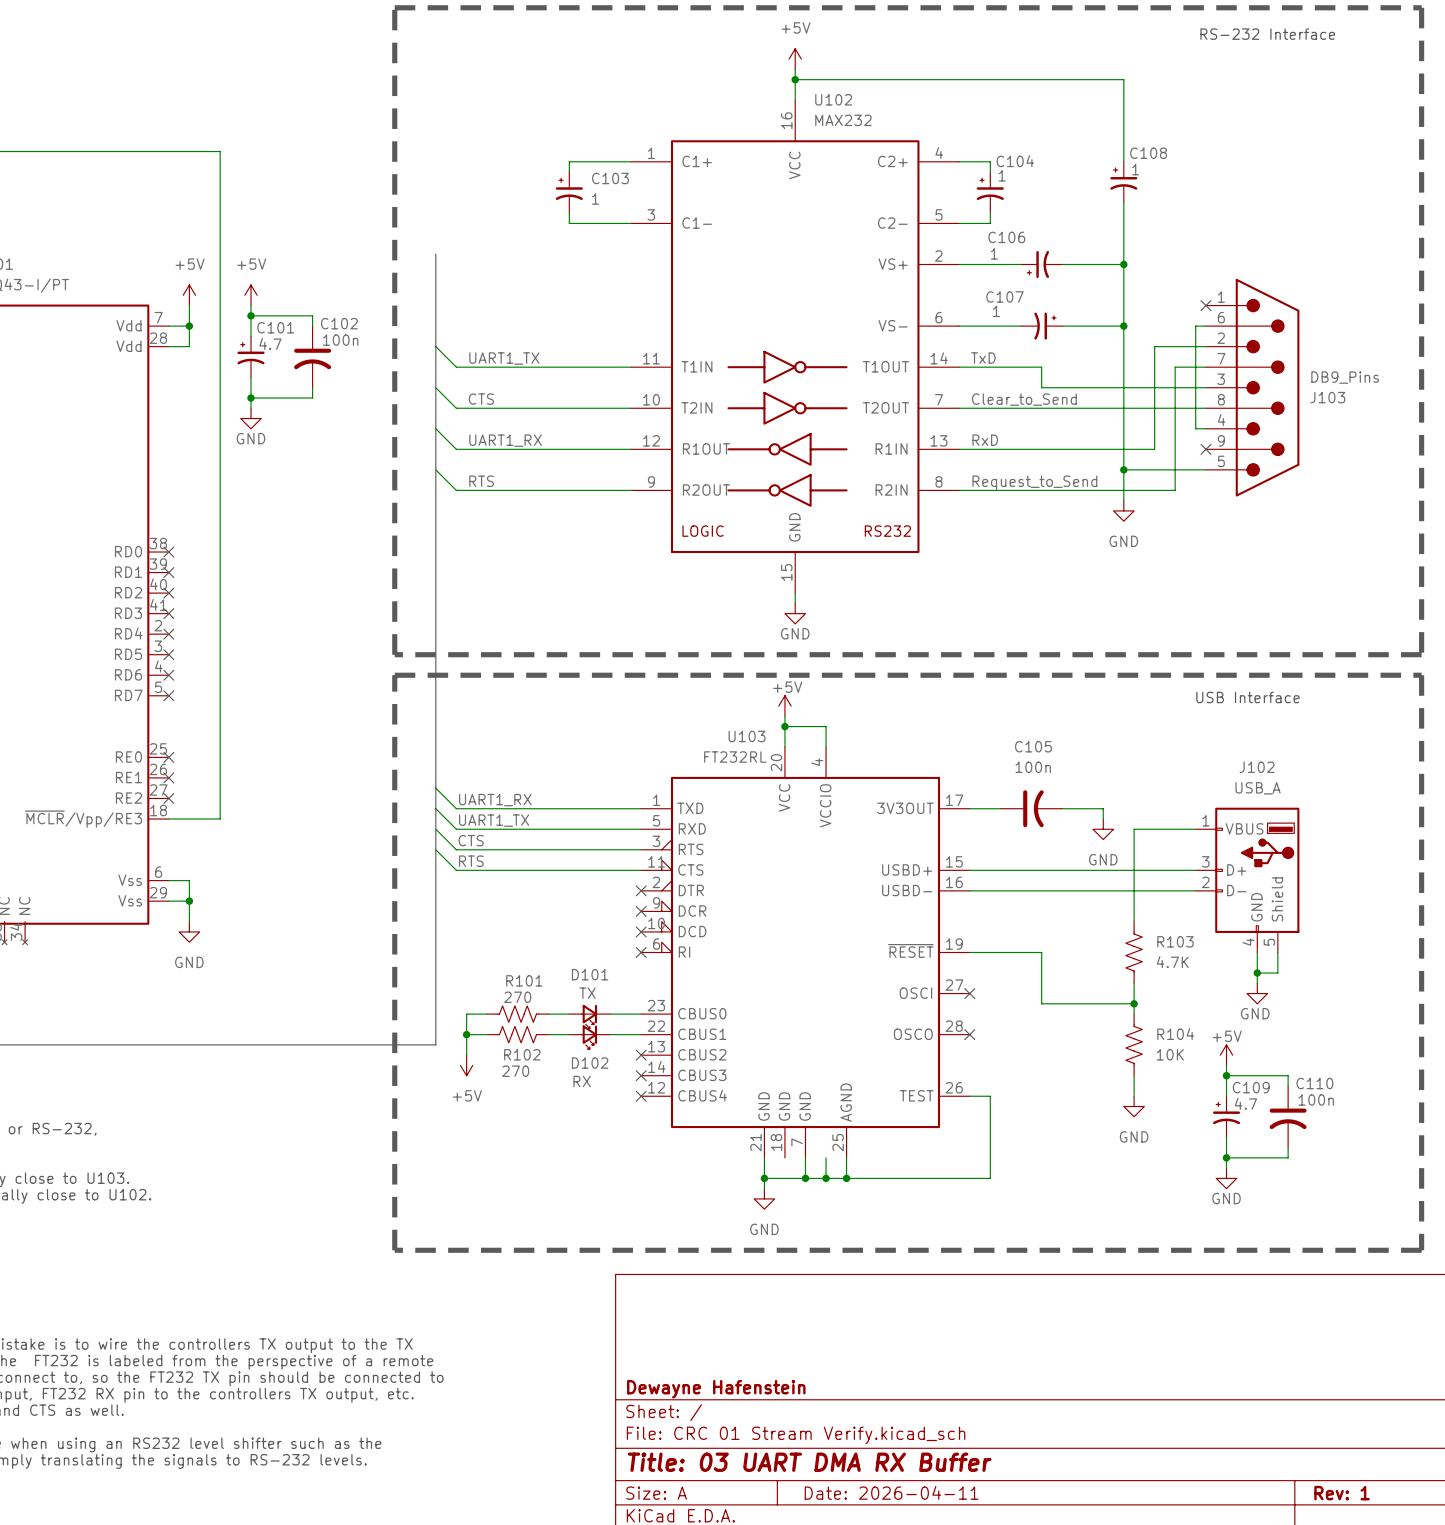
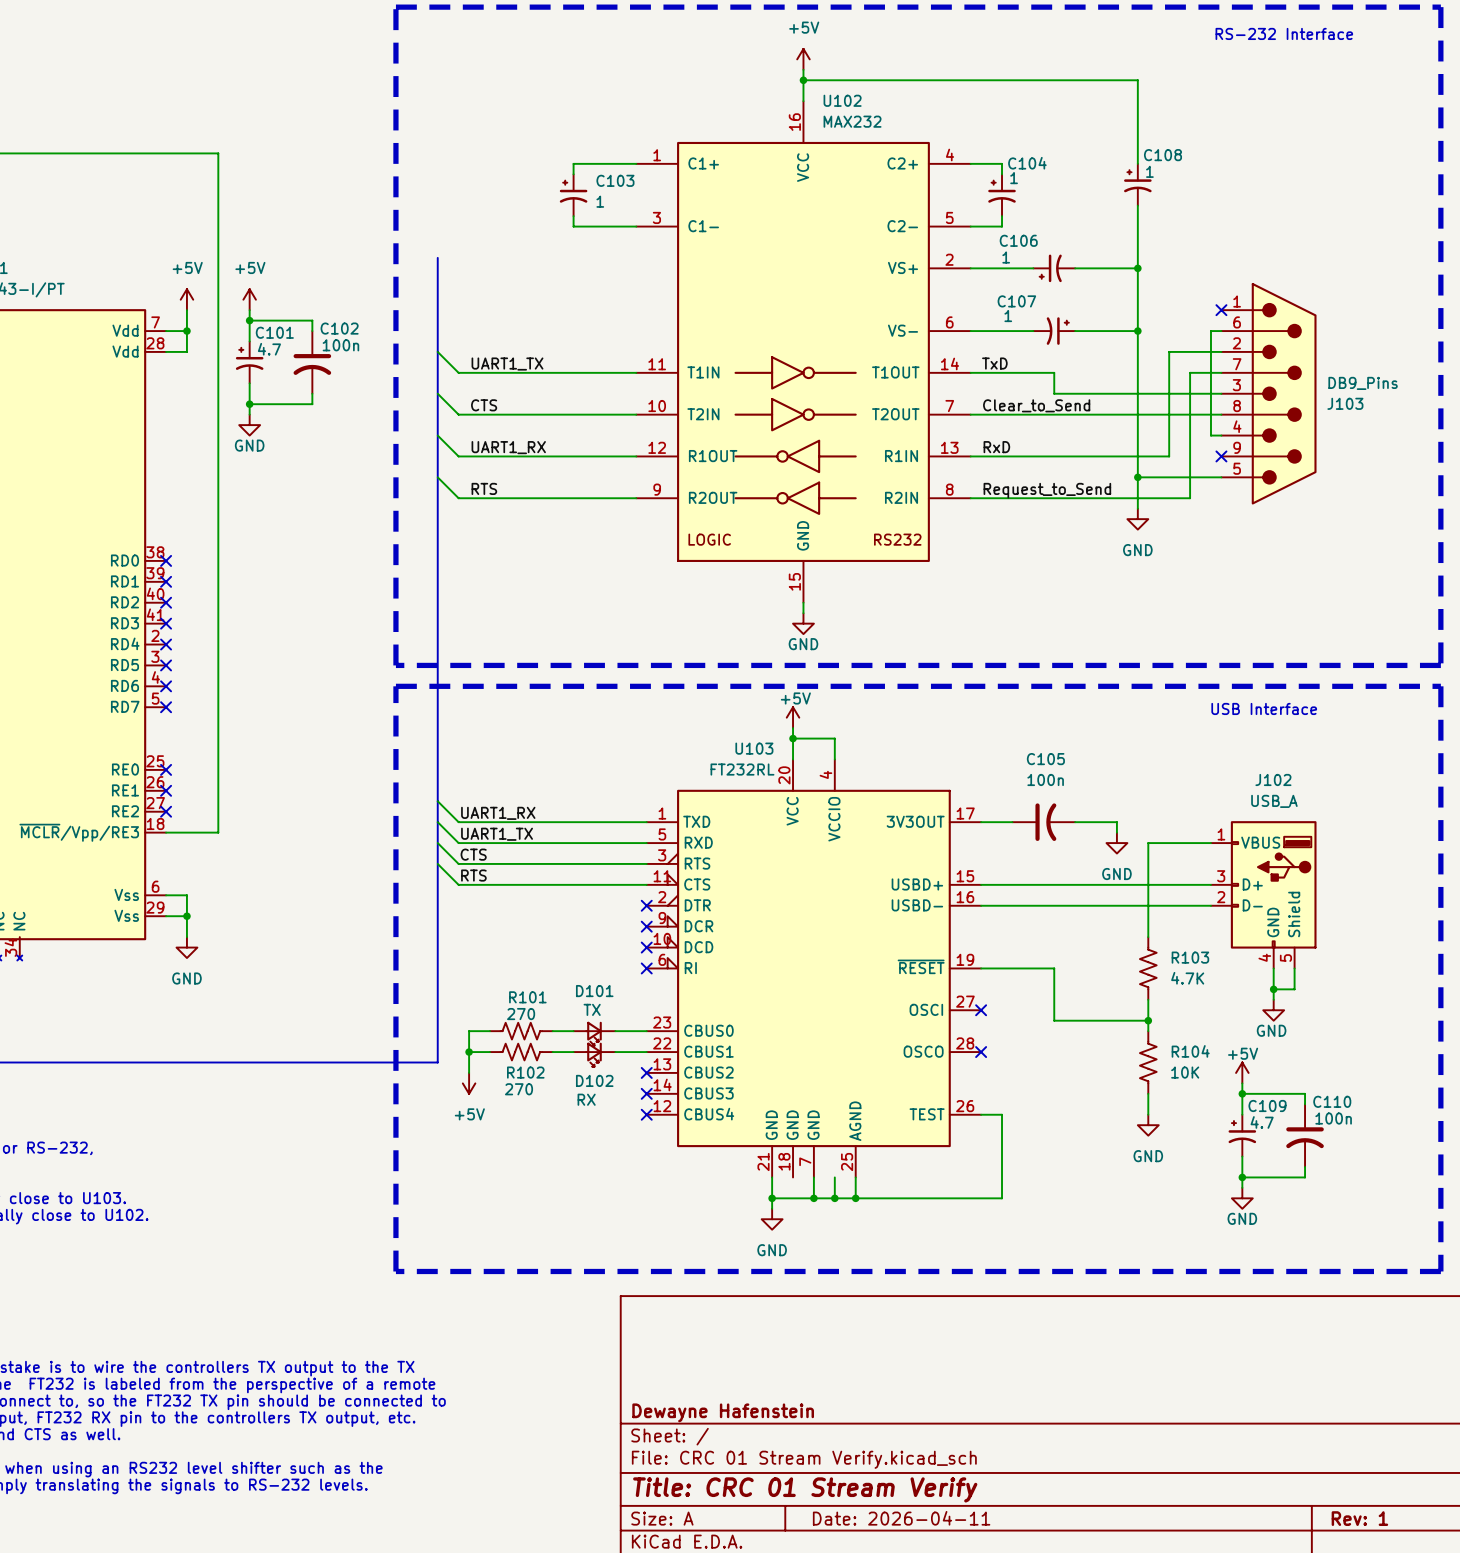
title block: Title: 03 UART DMA RX Buffer (809, 1462) -> Title: CRC 01 Stream Verify (805, 1489)

